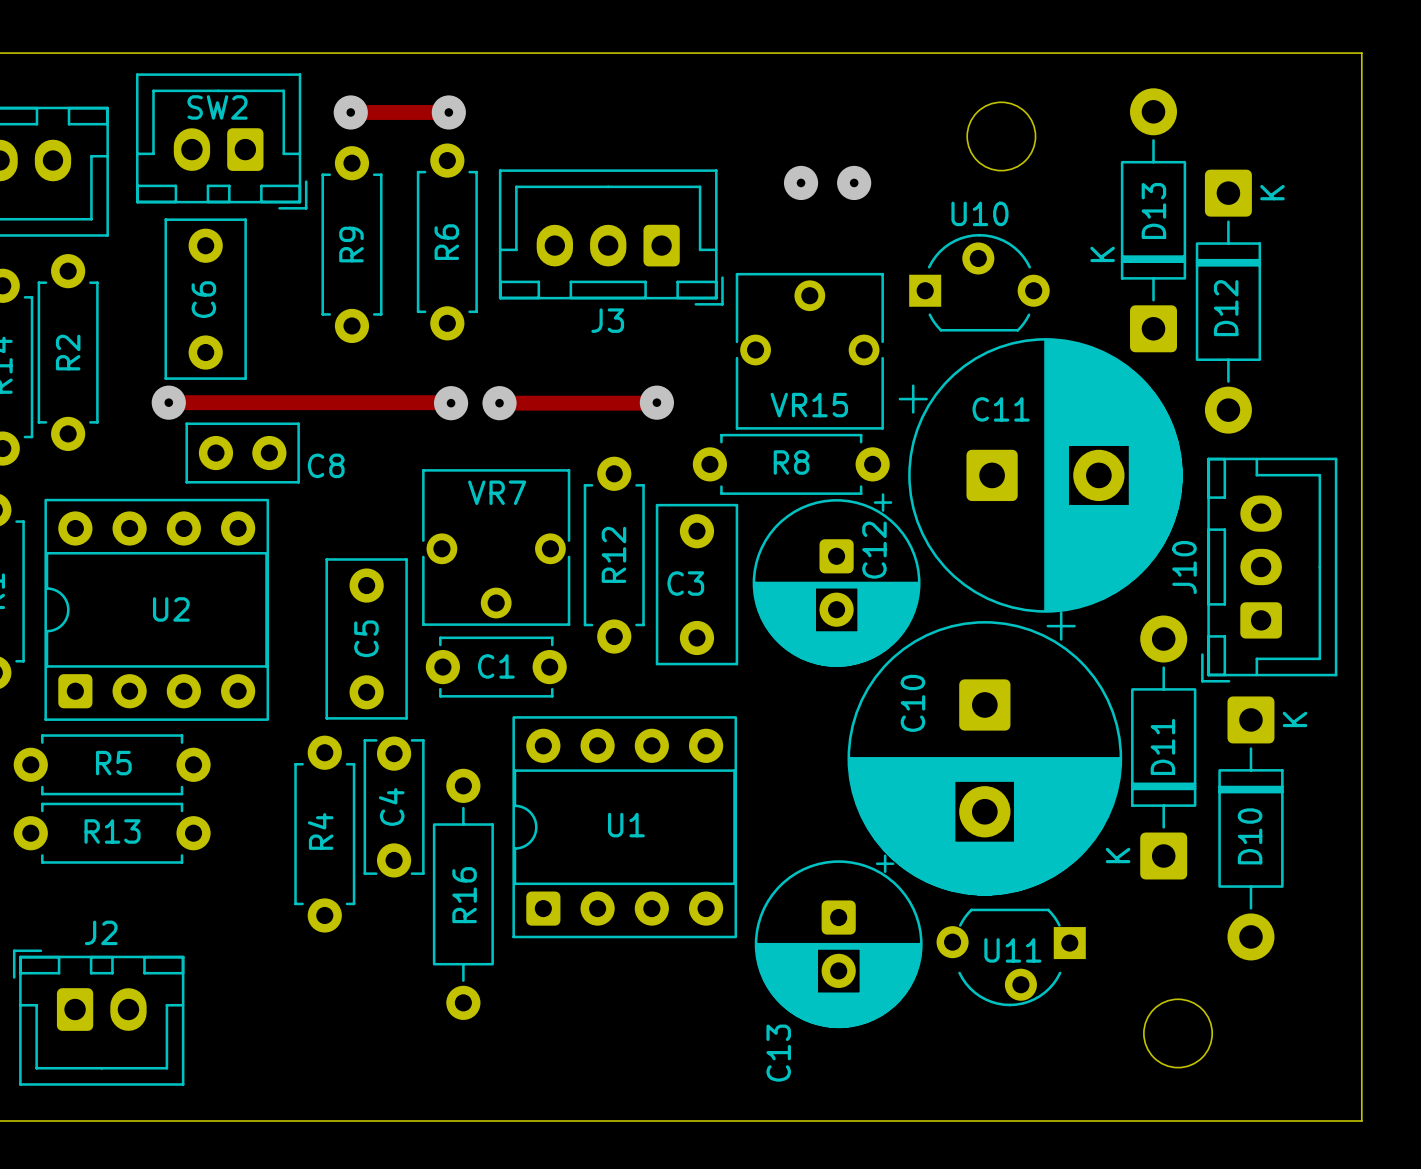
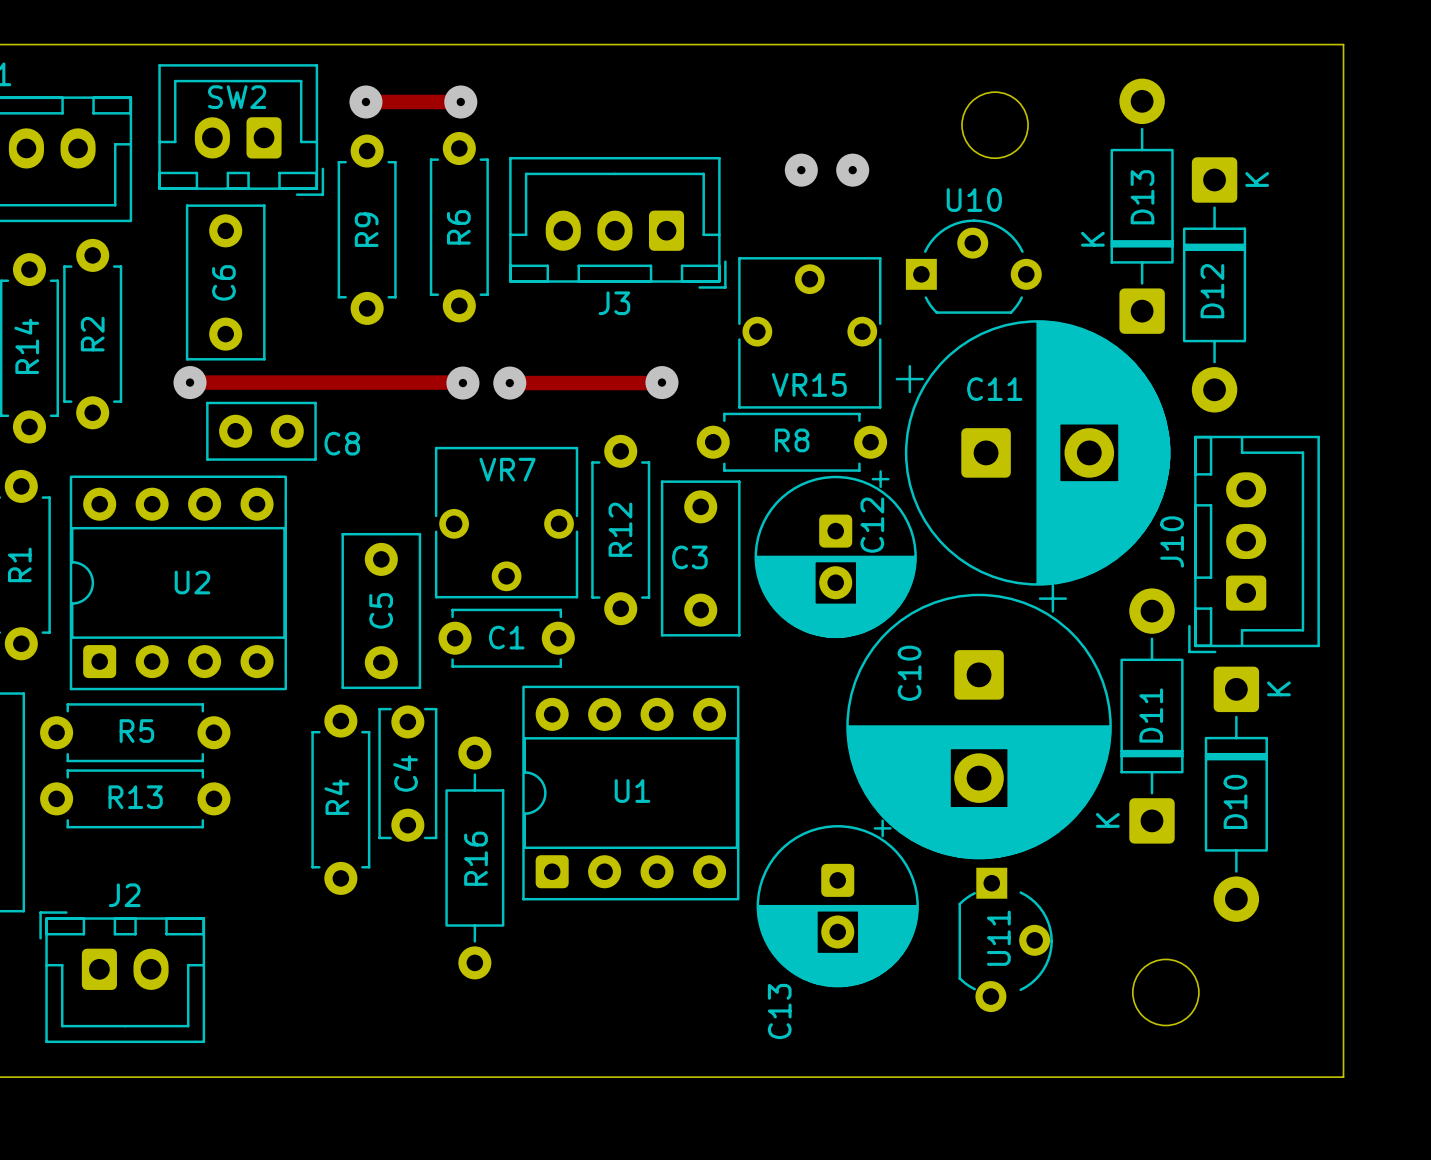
U11 footprint: [936, 908, 1086, 1007] -> [958, 867, 1053, 1013]

